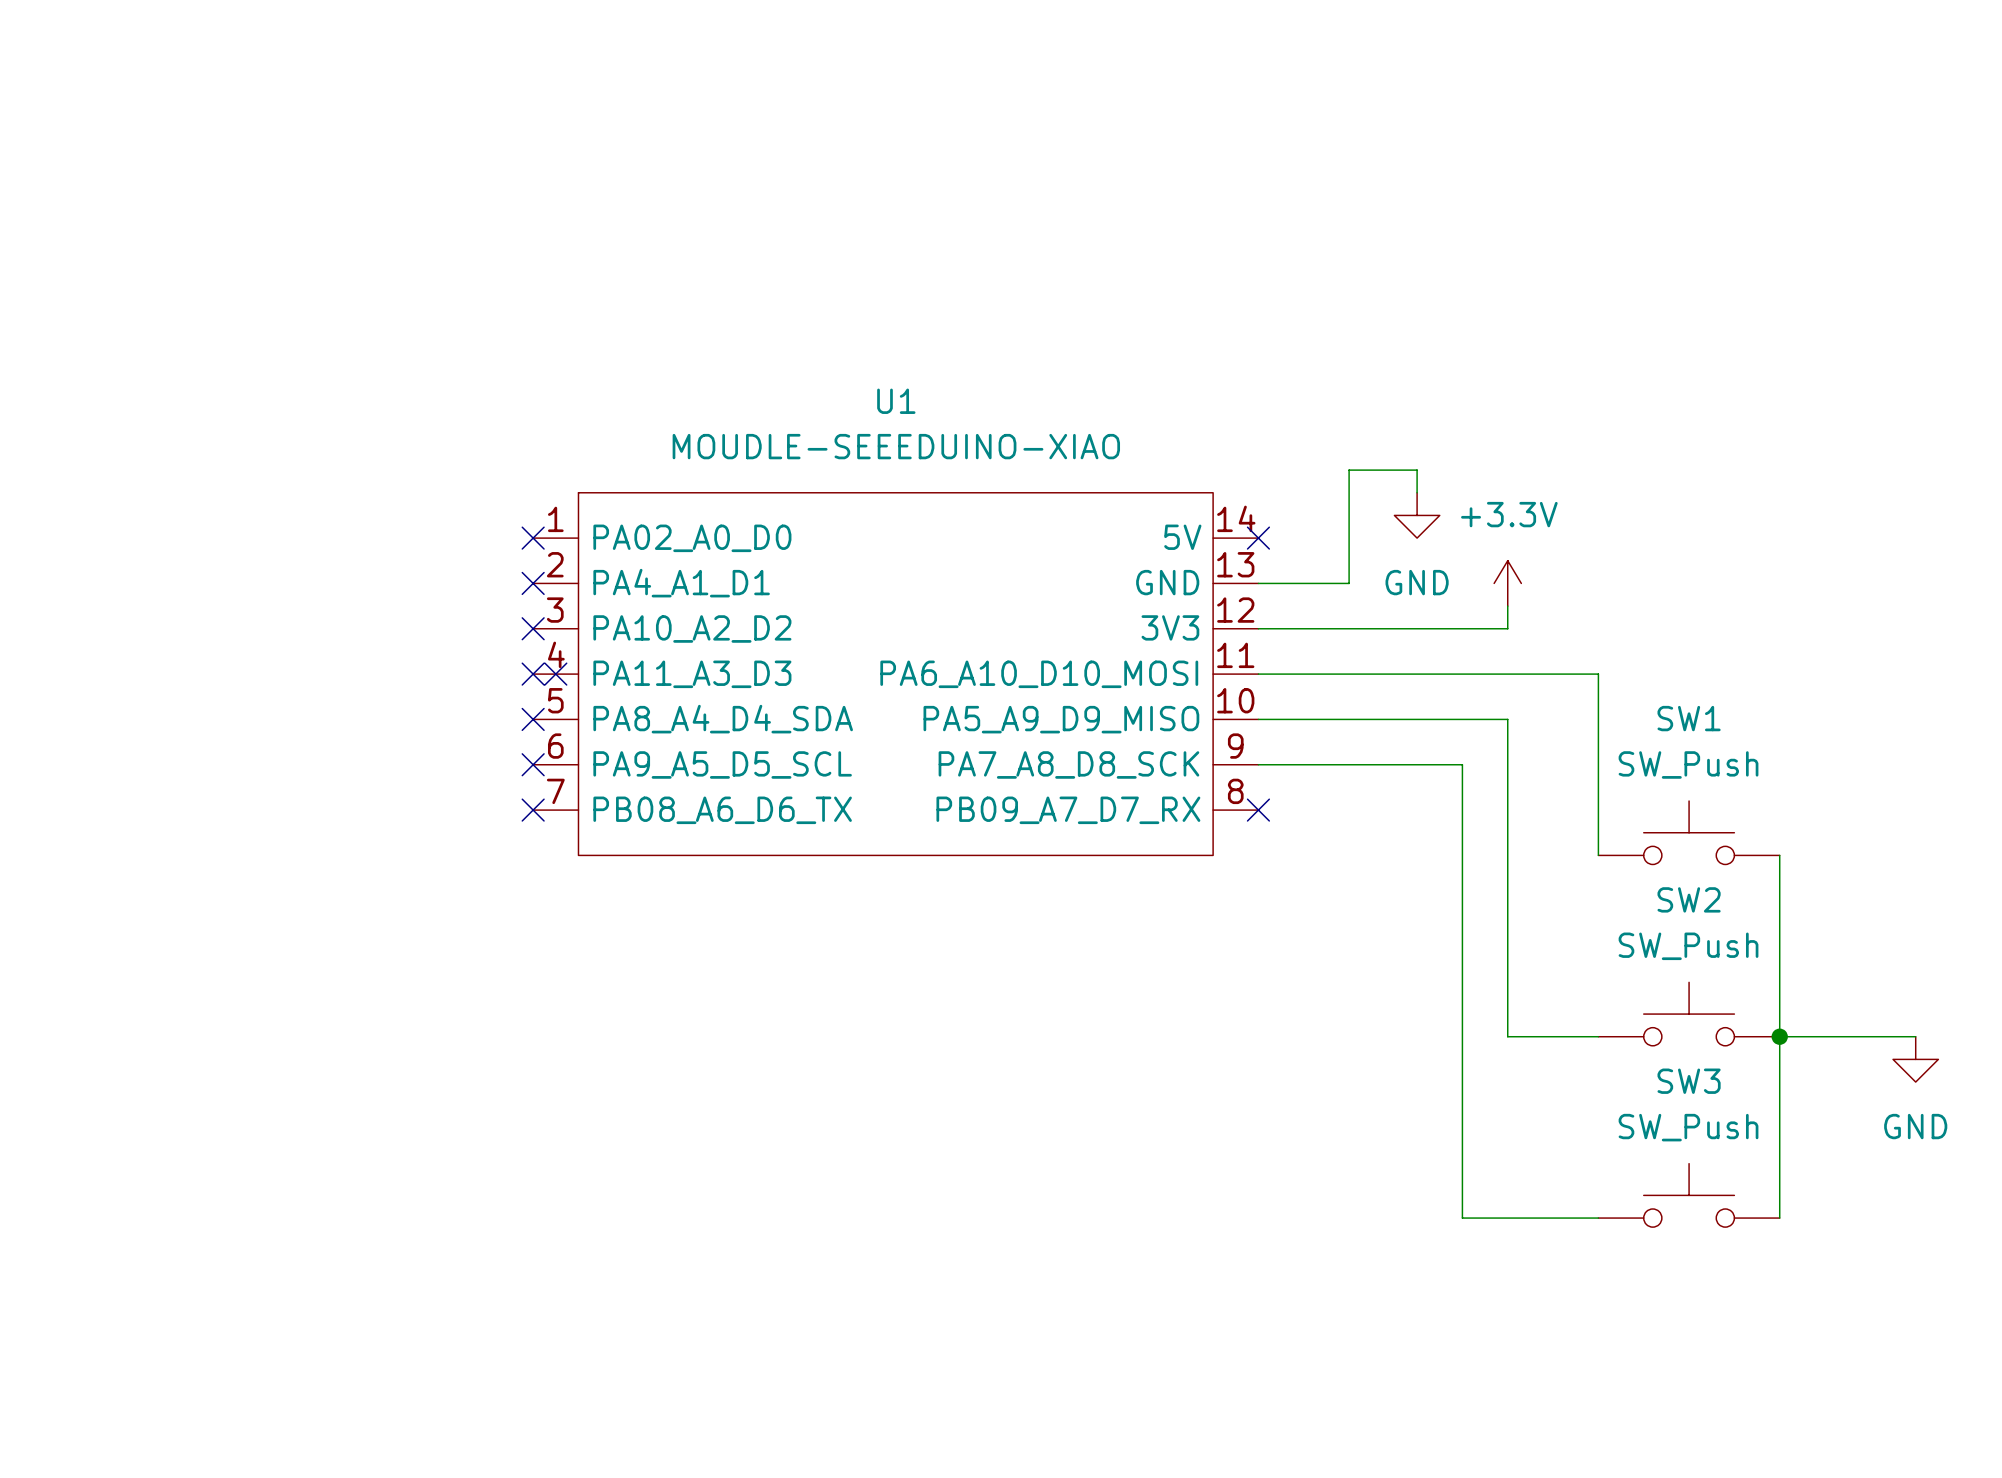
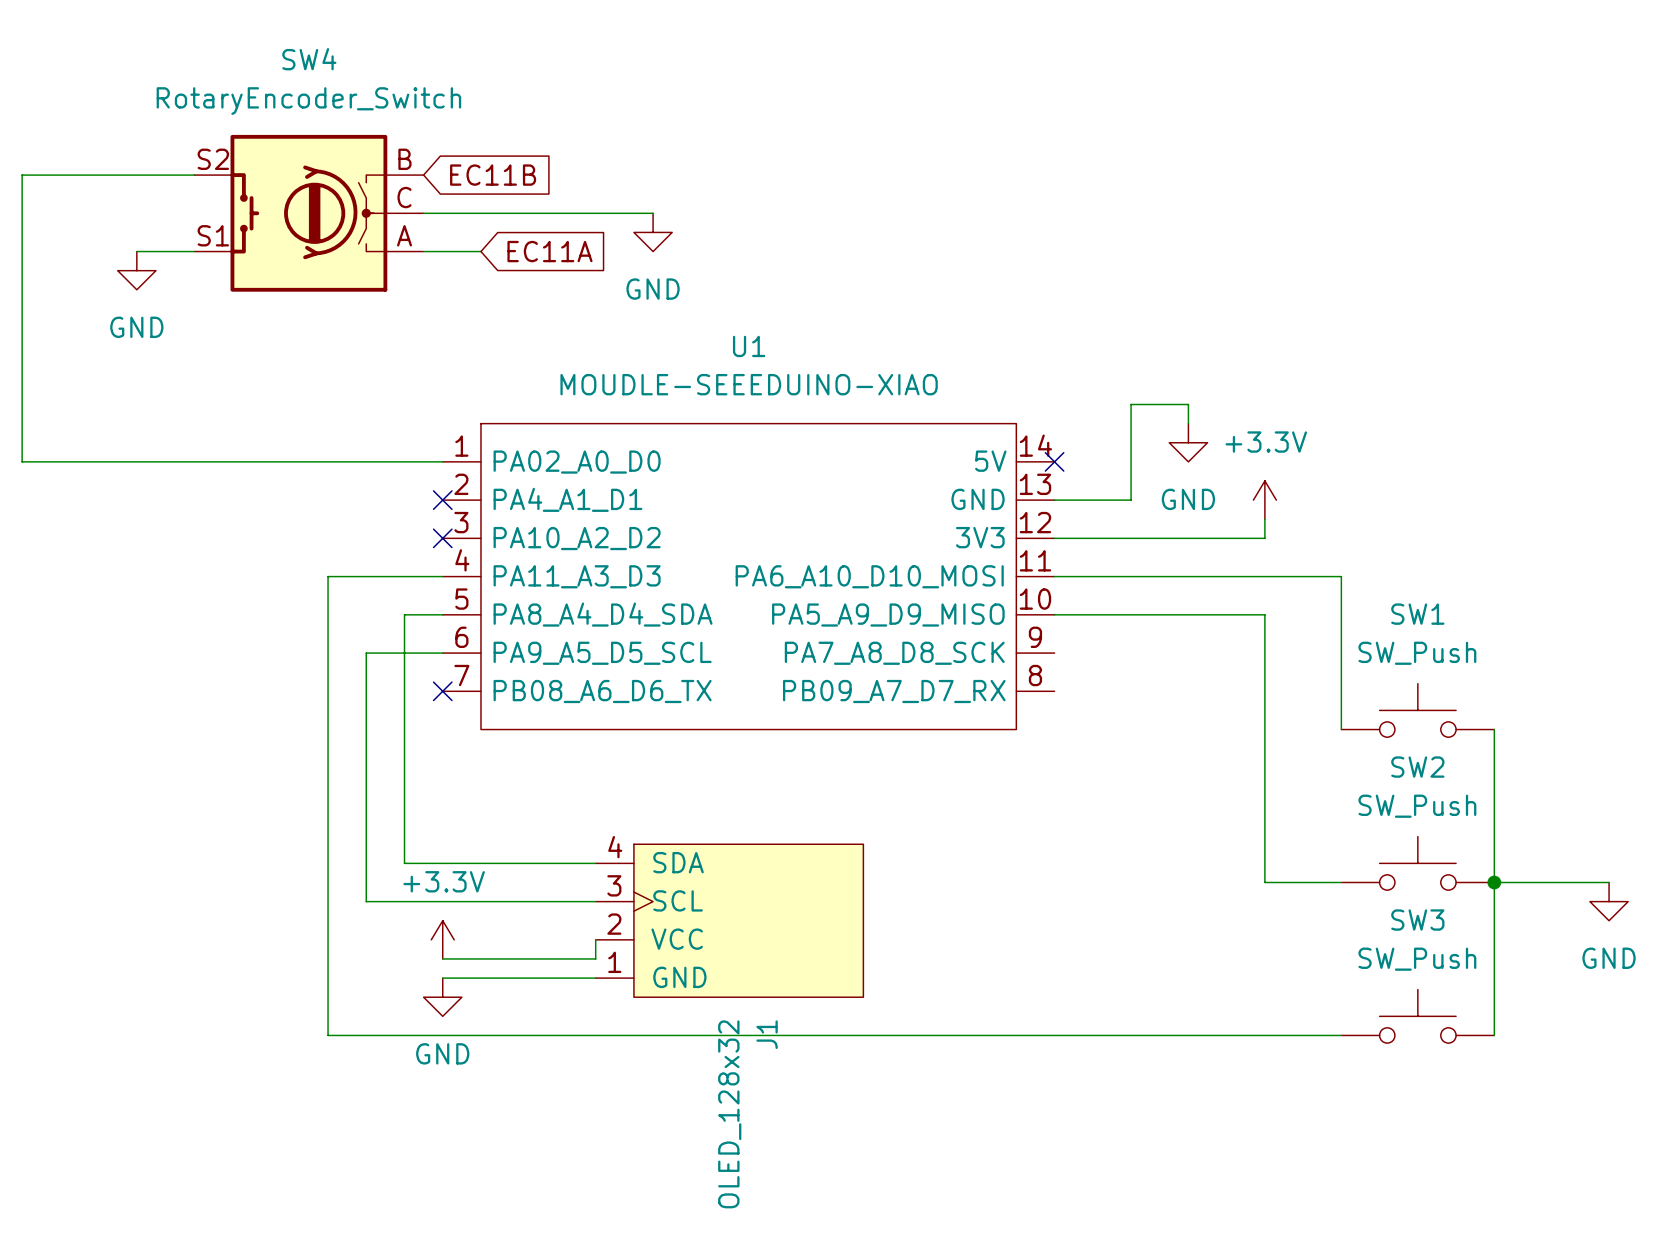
wire: none -> (194, 175) (22, 175) (22, 461) (442, 461)
global label: none -> EC11B (493, 175)
SW4: none -> RotaryEncoder_Switch (308, 213)
wire: none -> (423, 213) (653, 213)
power symbol: none -> GND (653, 232)
wire: none -> (136, 251) (194, 251)
wire: none -> (423, 251) (480, 251)
global label: none -> EC11A (549, 251)
power symbol: none -> GND (136, 270)
no-connect mark: (533, 538) -> none
no-connect mark: (533, 674) -> none
no-connect mark: (555, 674) -> none
wire: none -> (442, 614) (404, 614) (404, 863) (595, 863)
no-connect mark: (533, 719) -> none
wire: none -> (442, 653) (366, 653) (366, 901) (595, 901)
no-connect mark: (533, 764) -> none
wire: (1258, 764) (1462, 764) (1462, 1218) -> (442, 576) (328, 576) (328, 1035) (1226, 1035)
no-connect mark: (1258, 810) -> none
J1: none -> OLED_128x32 (729, 920)
power symbol: none -> +3.3V (442, 939)
wire: none -> (595, 939) (595, 958) (442, 958)
wire: none -> (442, 978) (595, 978)
power symbol: none -> GND (442, 997)

